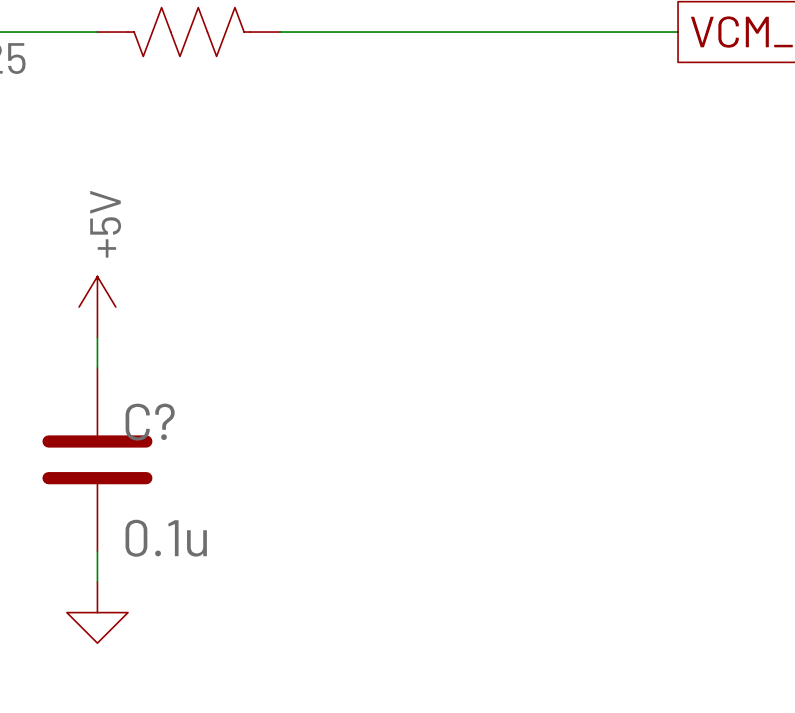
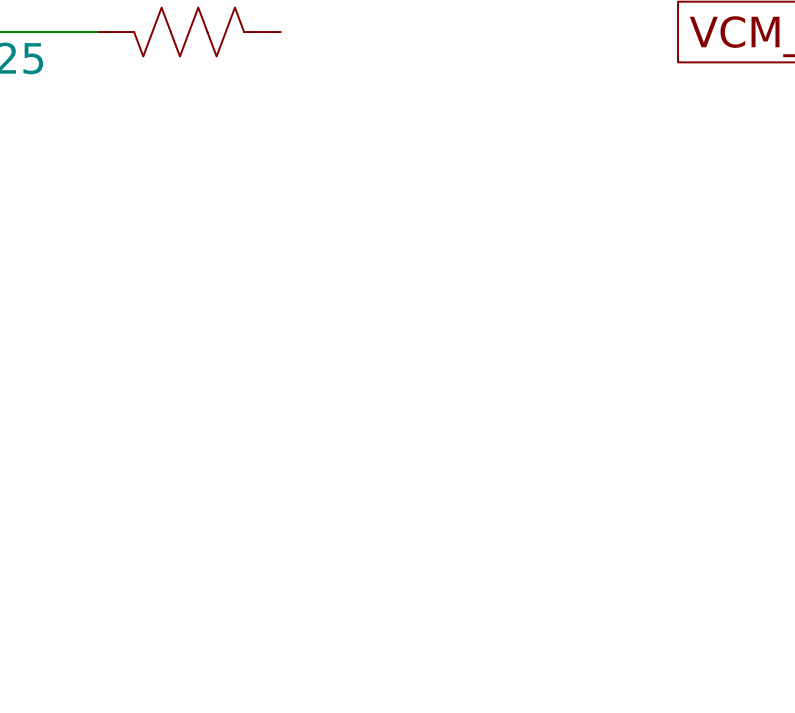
wire: (280, 32) (678, 32) -> none
power symbol: +5V (97, 307) -> none
wire: (97, 337) (97, 368) -> none
C?: 0.1u (97, 459) -> none
wire: (97, 551) (97, 582) -> none
power symbol: (97, 612) -> none

